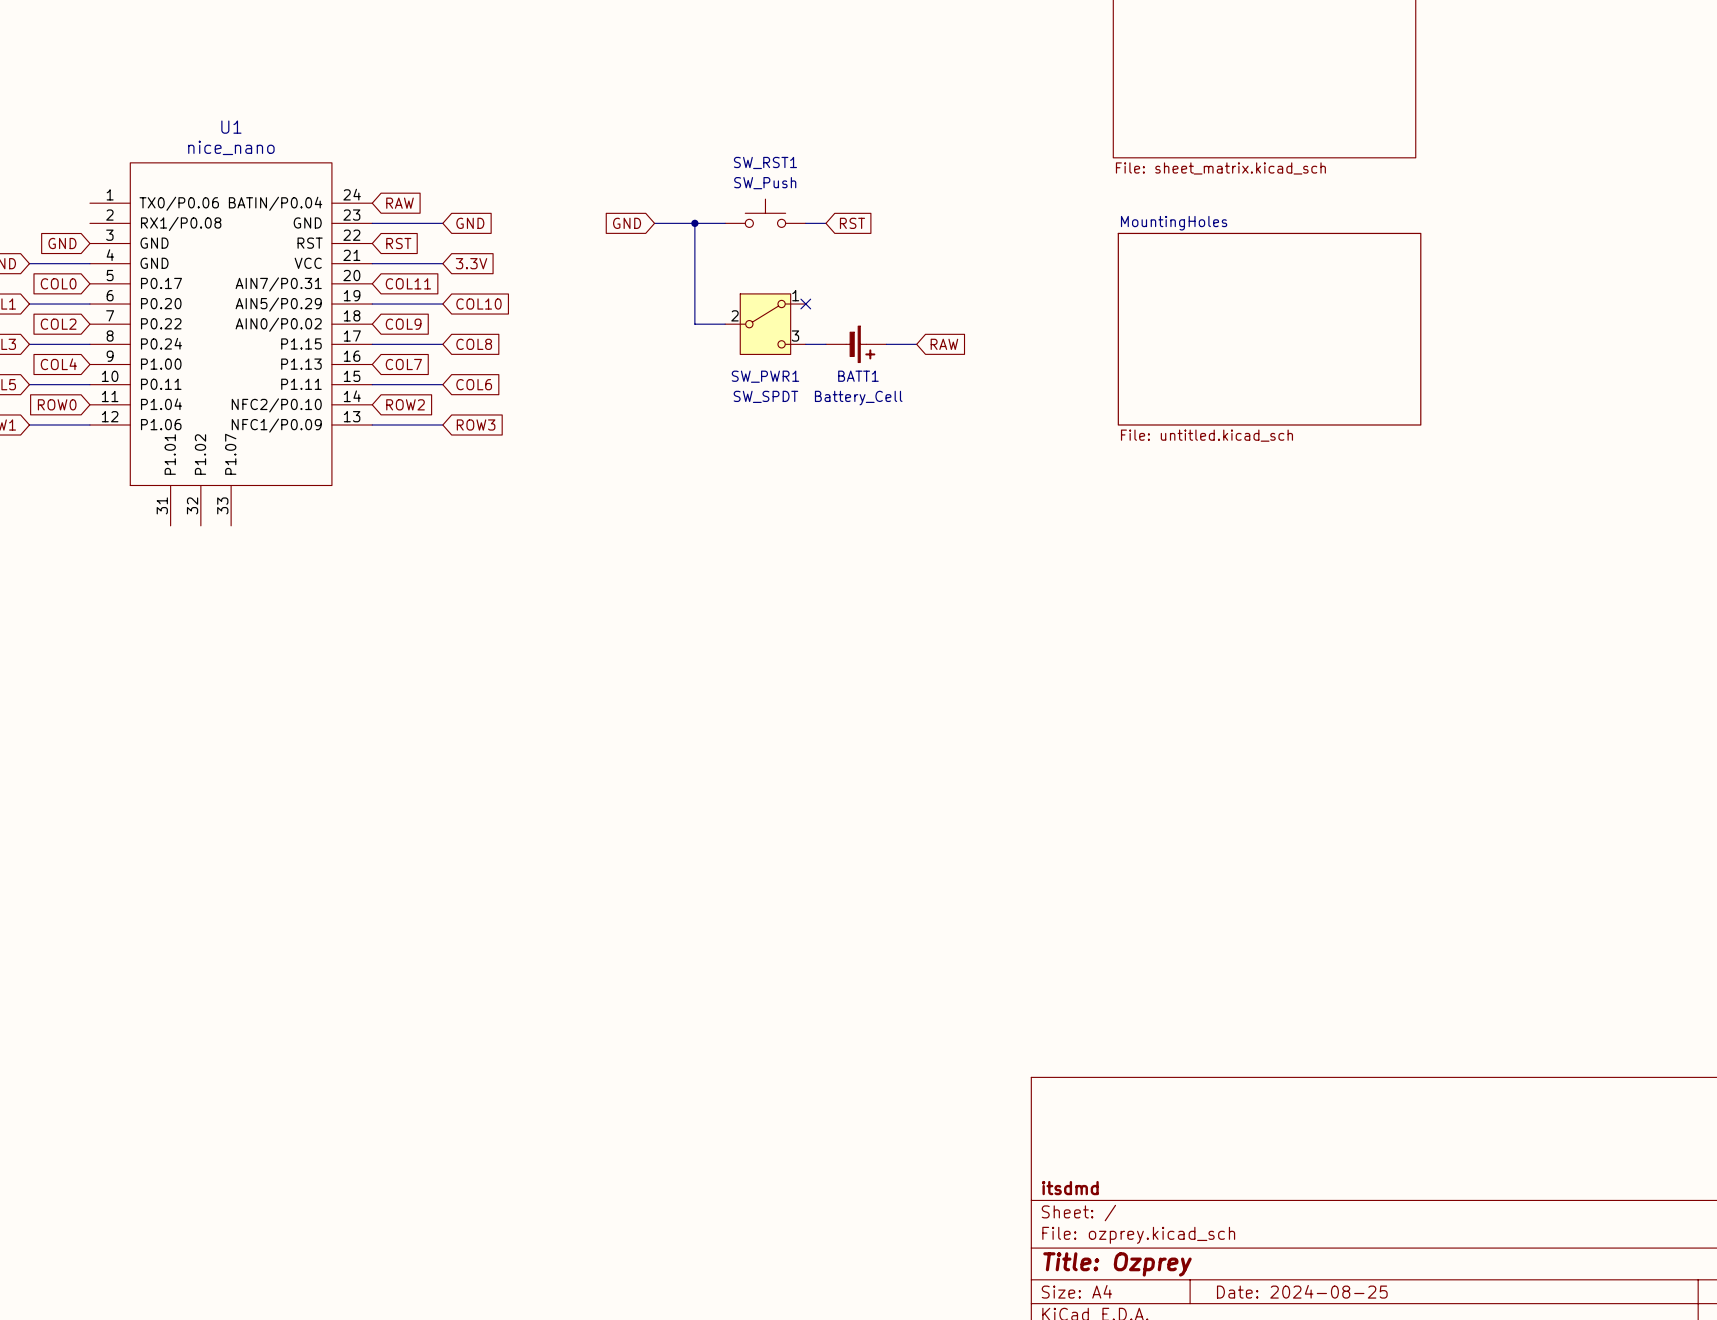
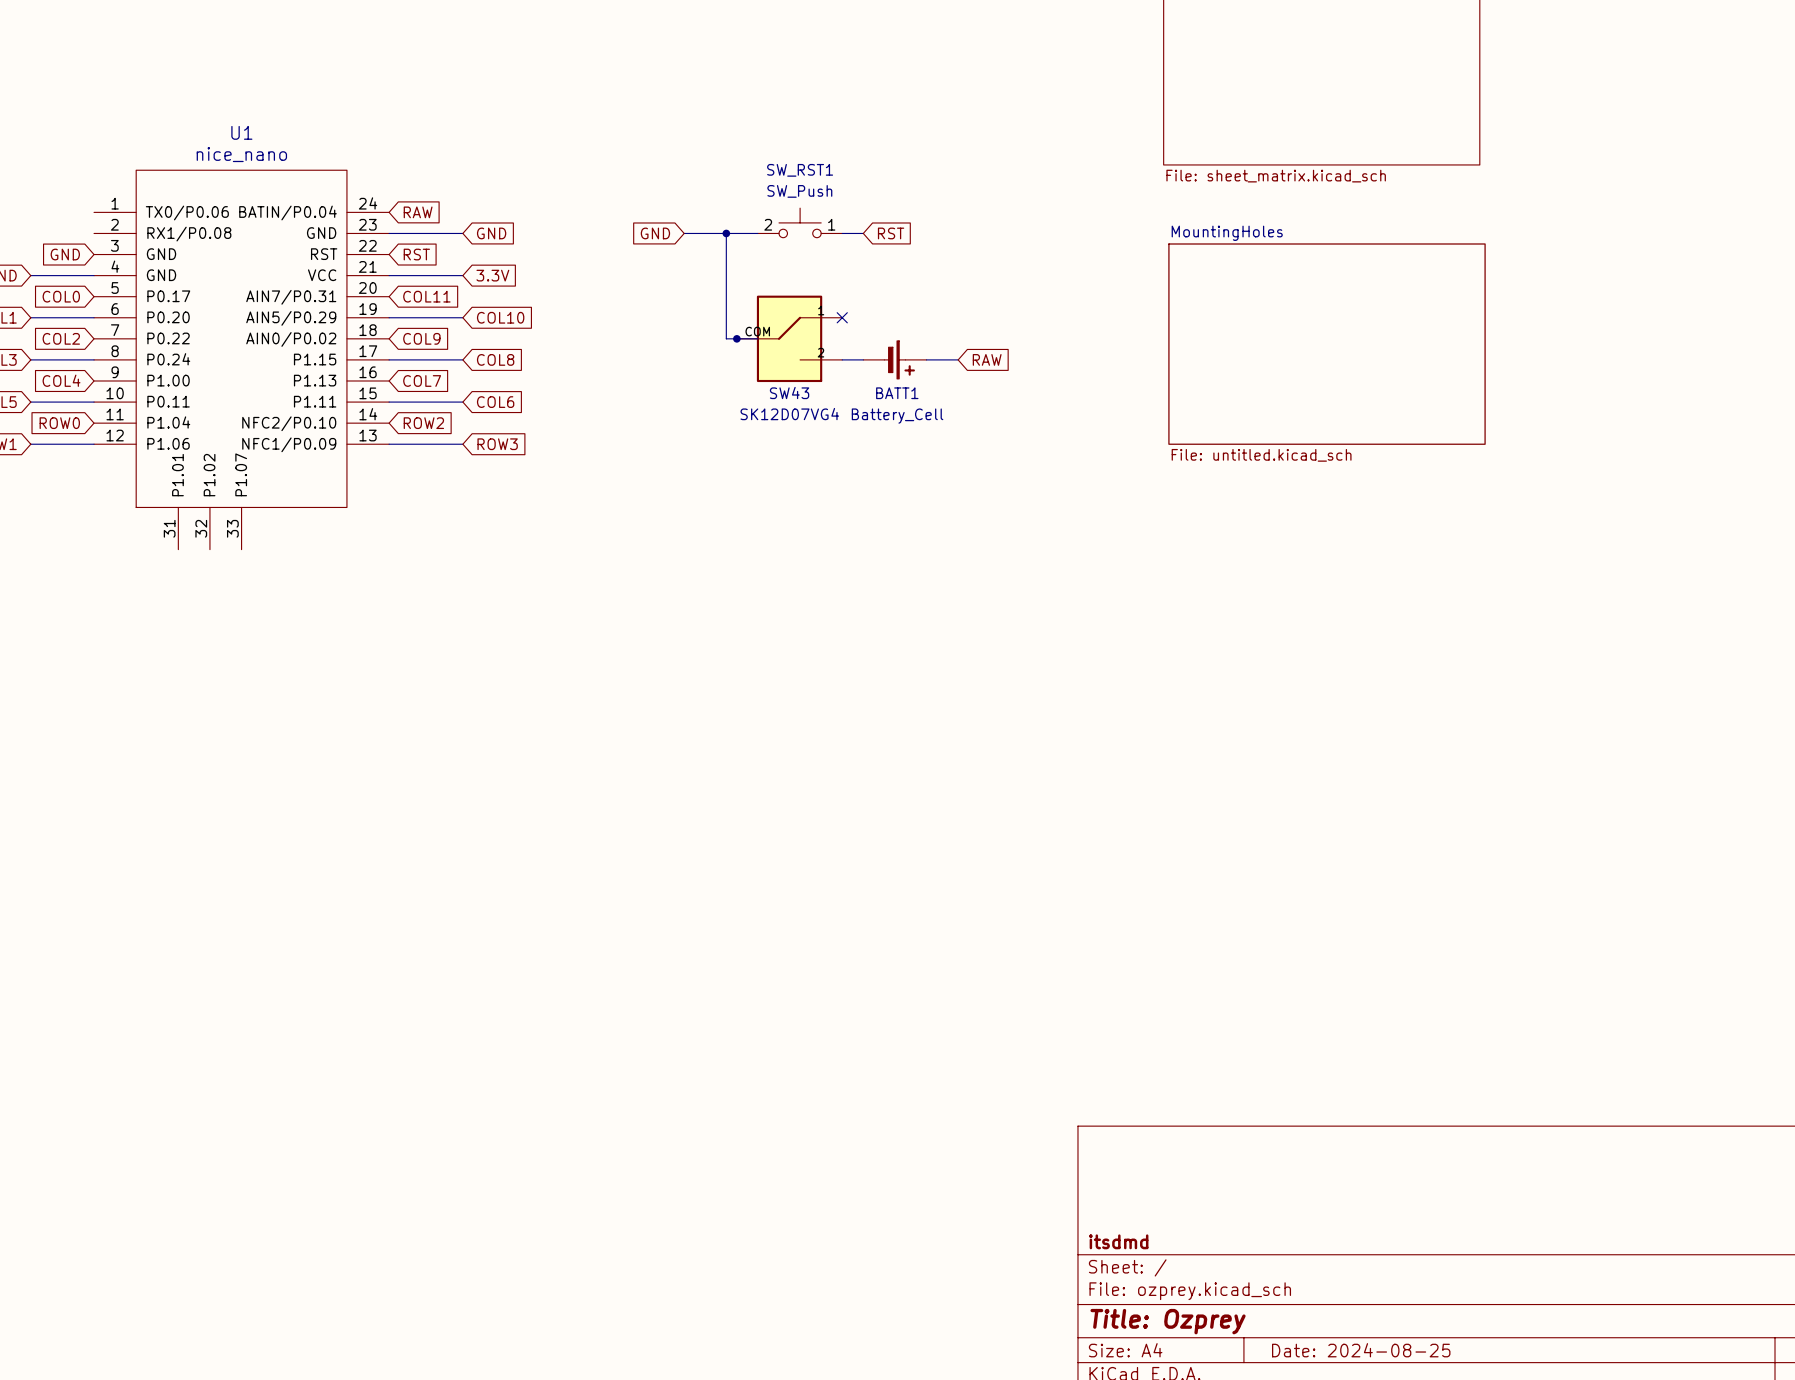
SW_RST1 pin number: none -> 2 (768, 224)
SW_RST1 pin number: none -> 1 (831, 224)
junction: none -> (736, 338)
SW43: none -> SK12D07VG4 (789, 338)
SW_PWR1: SW_SPDT (765, 324) -> none

